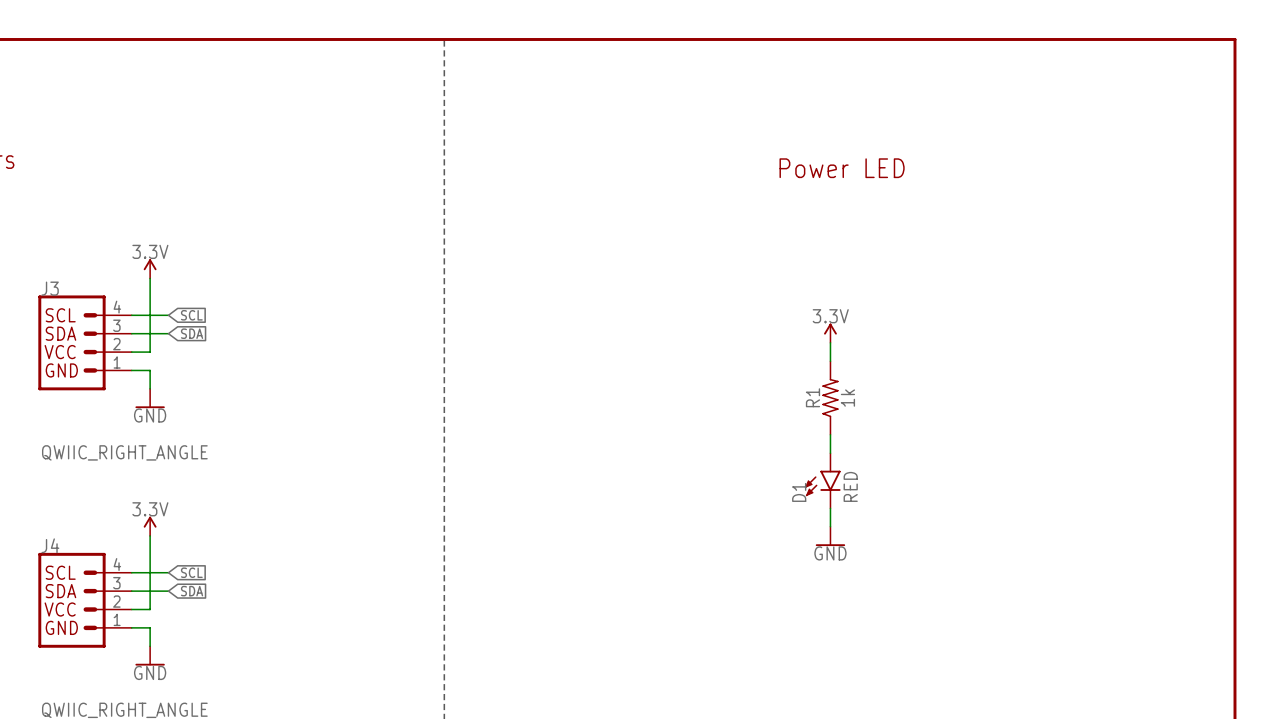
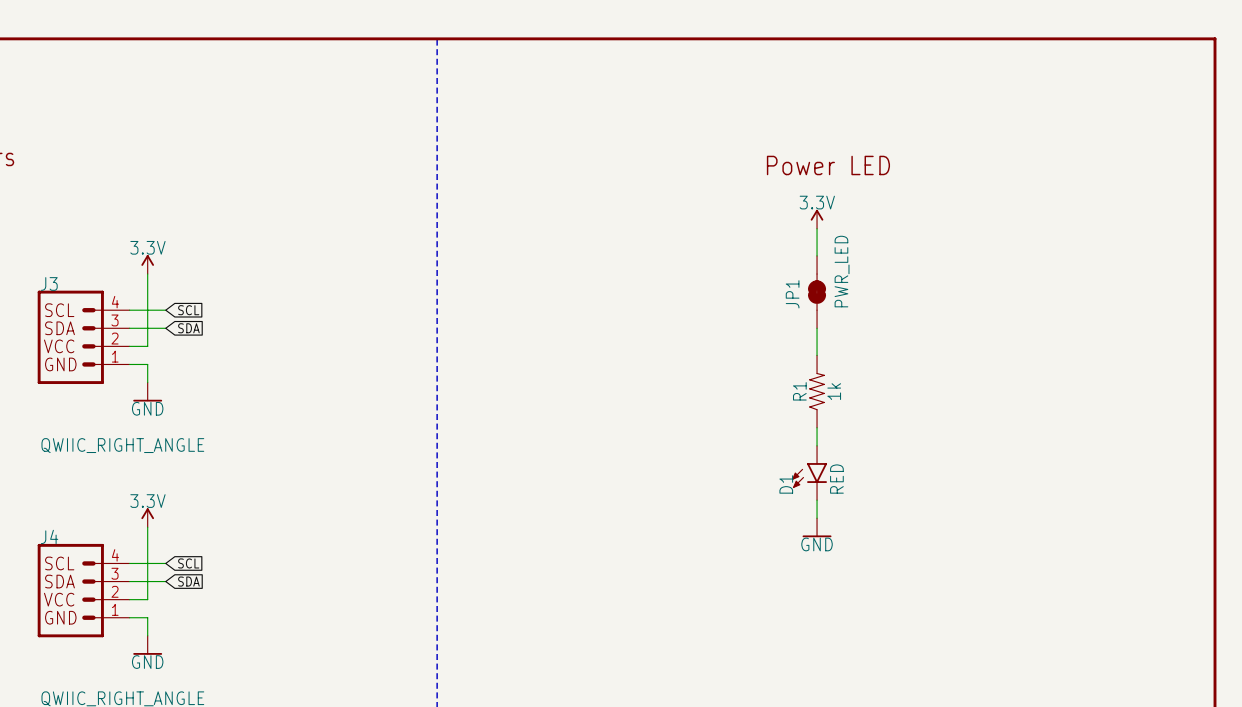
wire: none -> (817, 228) (817, 255)
JP1: none -> PWR_LED (817, 292)
power symbol position: 3.3V (830, 333) -> 3.3V (817, 219)

